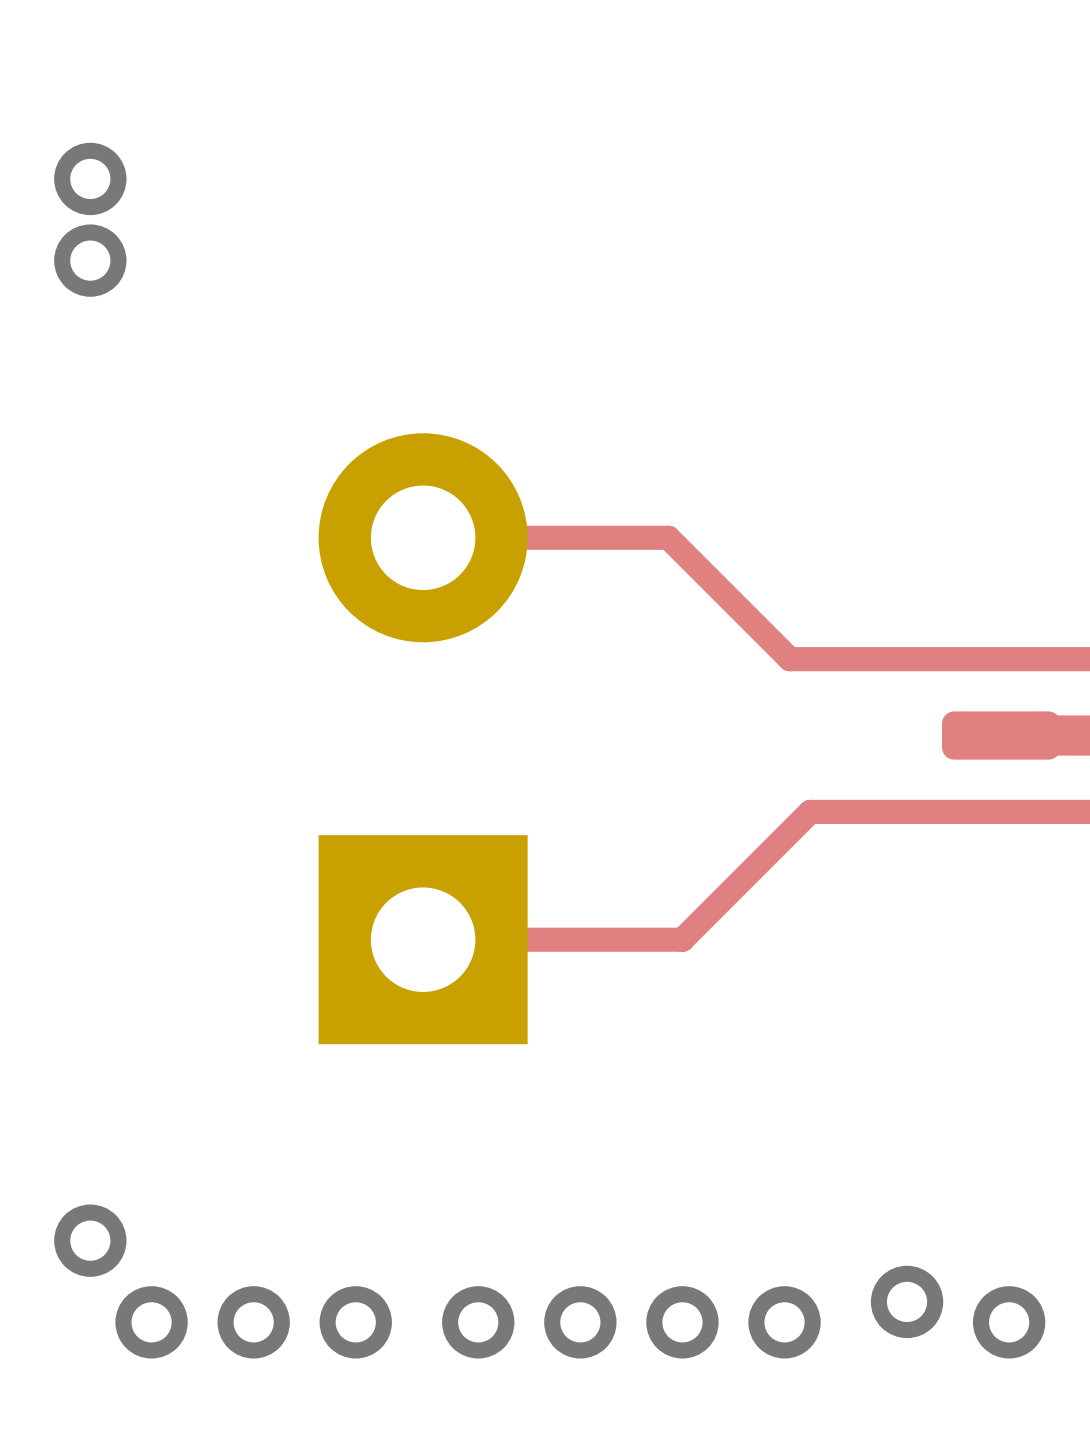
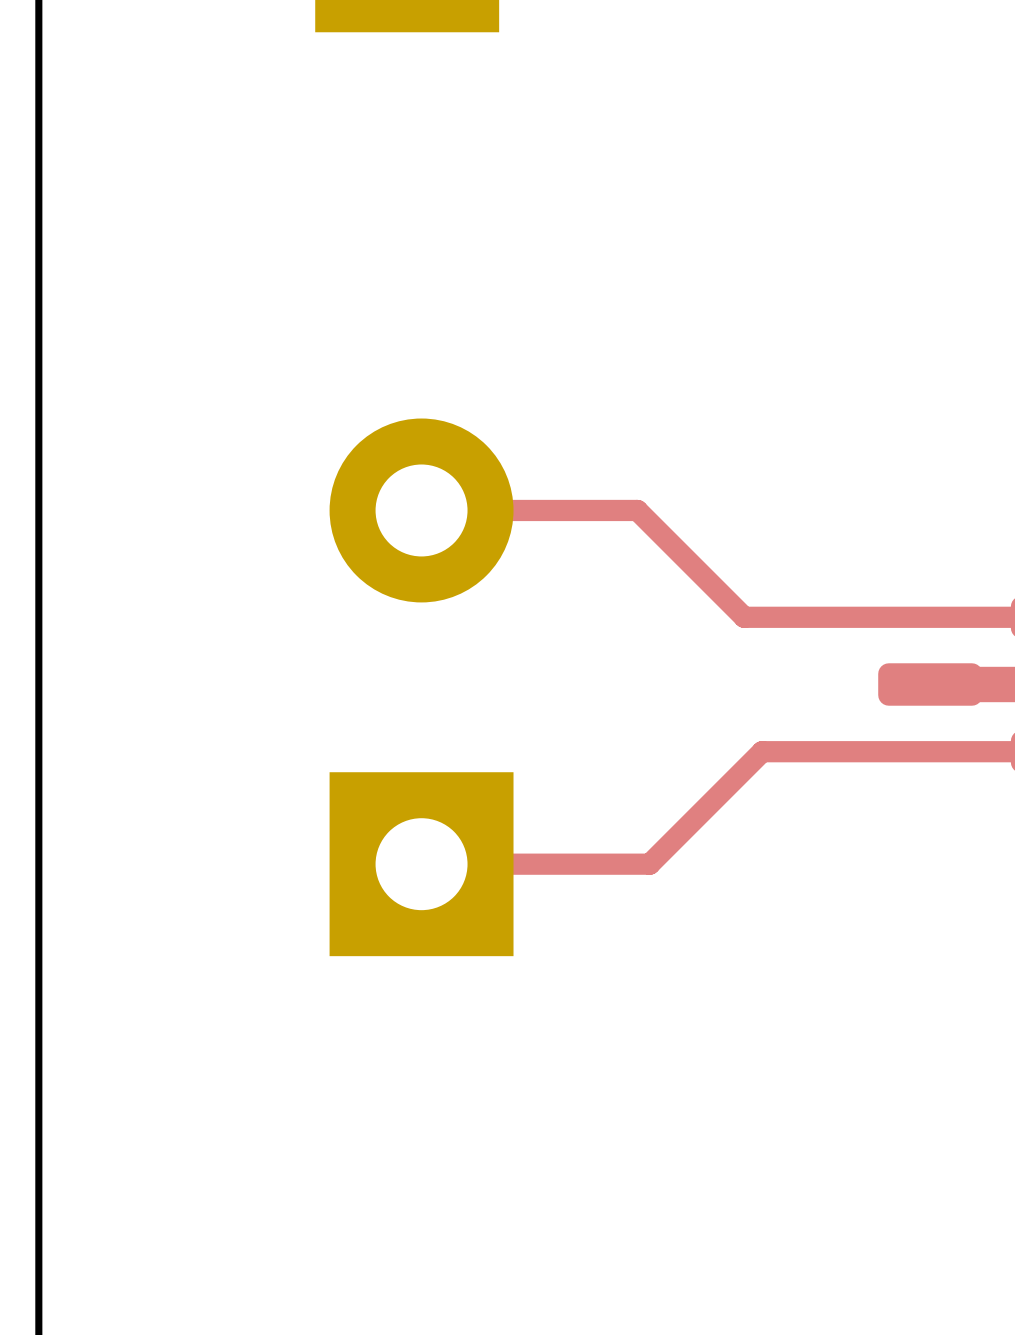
via: (90, 178) -> none
via: (90, 260) -> none
via: (90, 1240) -> none
via: (907, 1301) -> none
via: (151, 1322) -> none
via: (253, 1322) -> none
via: (355, 1322) -> none
via: (478, 1322) -> none
via: (580, 1322) -> none
via: (682, 1322) -> none
via: (784, 1322) -> none
via: (1009, 1322) -> none

